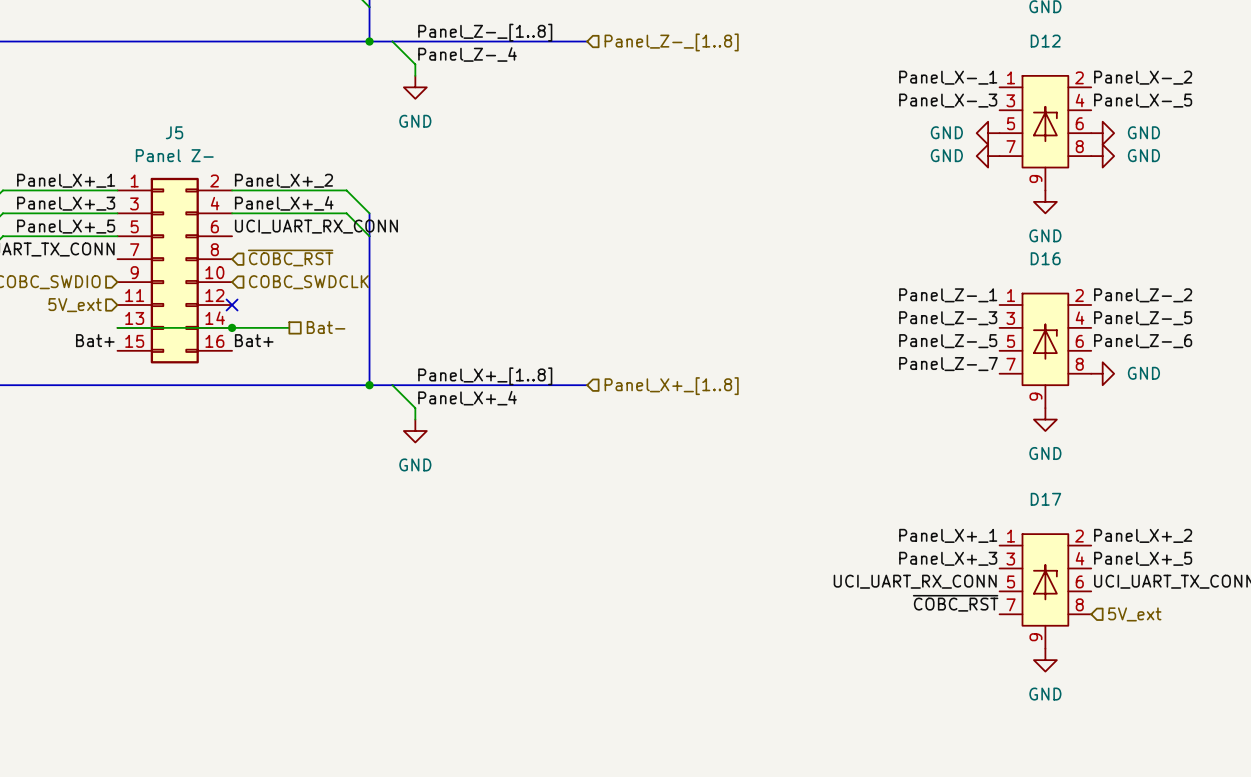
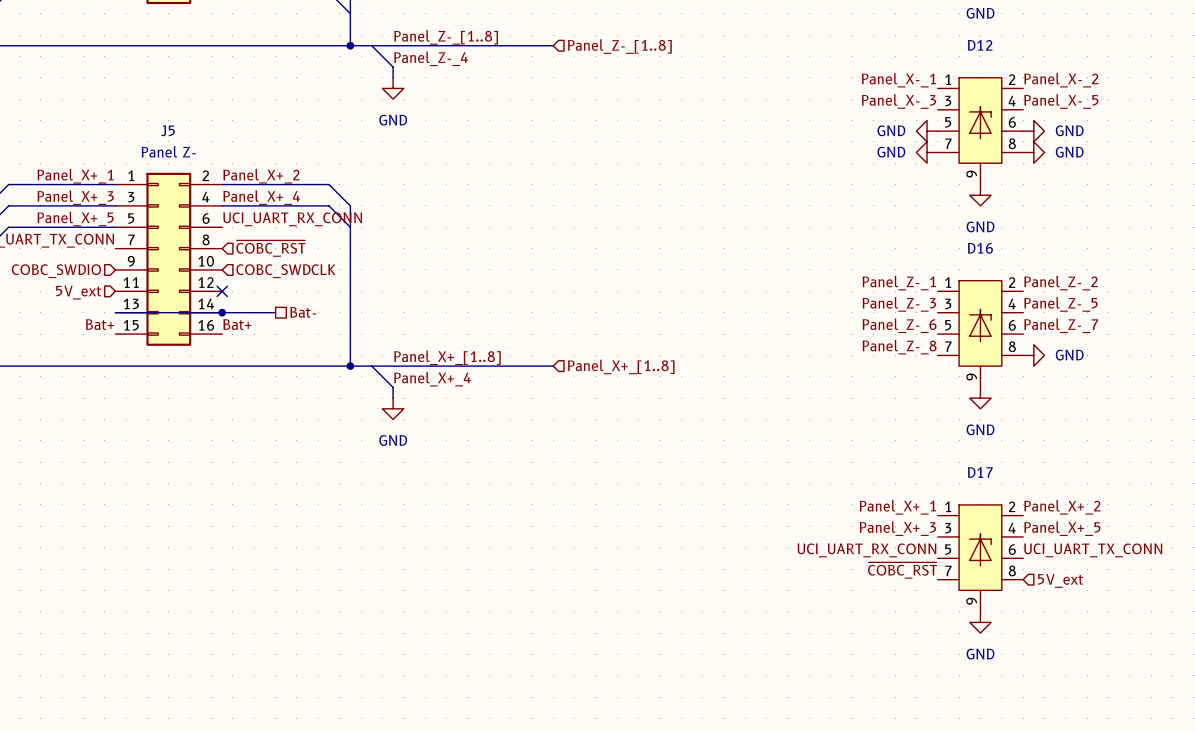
label: Panel_Z-_5 (948, 341) -> Panel_Z-_6 (899, 325)
label: Panel_Z-_6 (1143, 341) -> Panel_Z-_7 (1061, 325)
label: Panel_Z-_7 (948, 364) -> Panel_Z-_8 (899, 347)

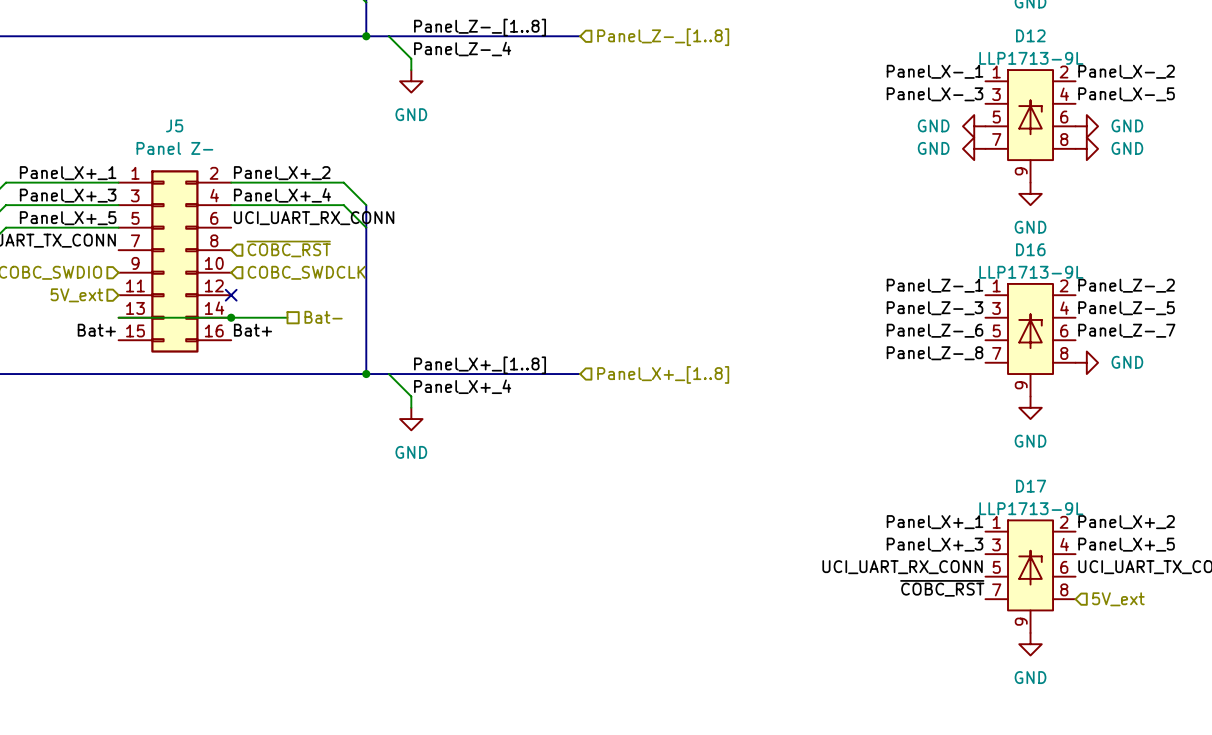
D12 value: none -> LLP1713-9L (1031, 58)
D16 value: none -> LLP1713-9L (1031, 272)
D17 value: none -> LLP1713-9L (1031, 508)

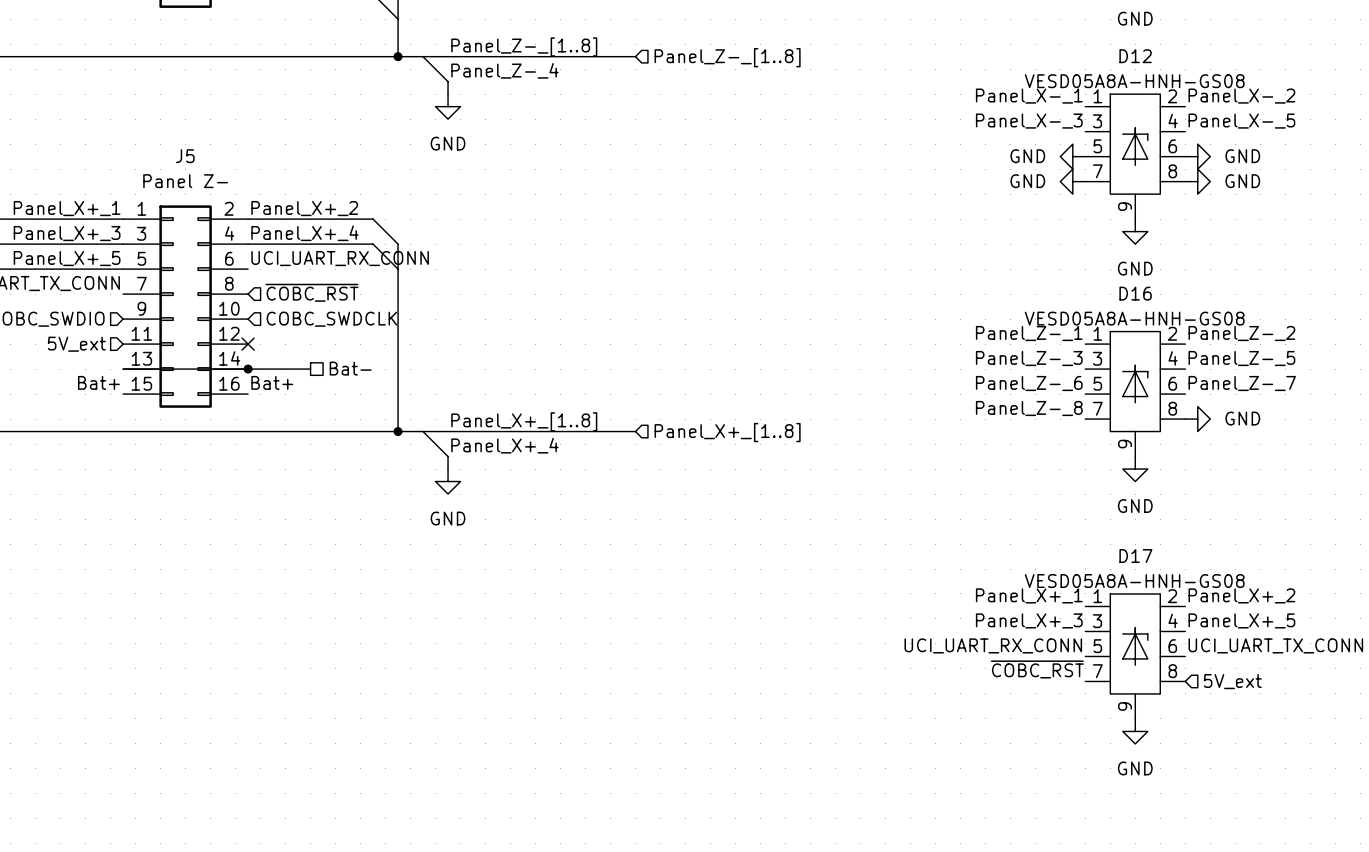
D12 value: LLP1713-9L (1031, 58) -> VESD05A8A-HNH-GS08 (1134, 81)
D16 value: LLP1713-9L (1031, 272) -> VESD05A8A-HNH-GS08 (1134, 318)
D17 value: LLP1713-9L (1031, 508) -> VESD05A8A-HNH-GS08 (1134, 581)

